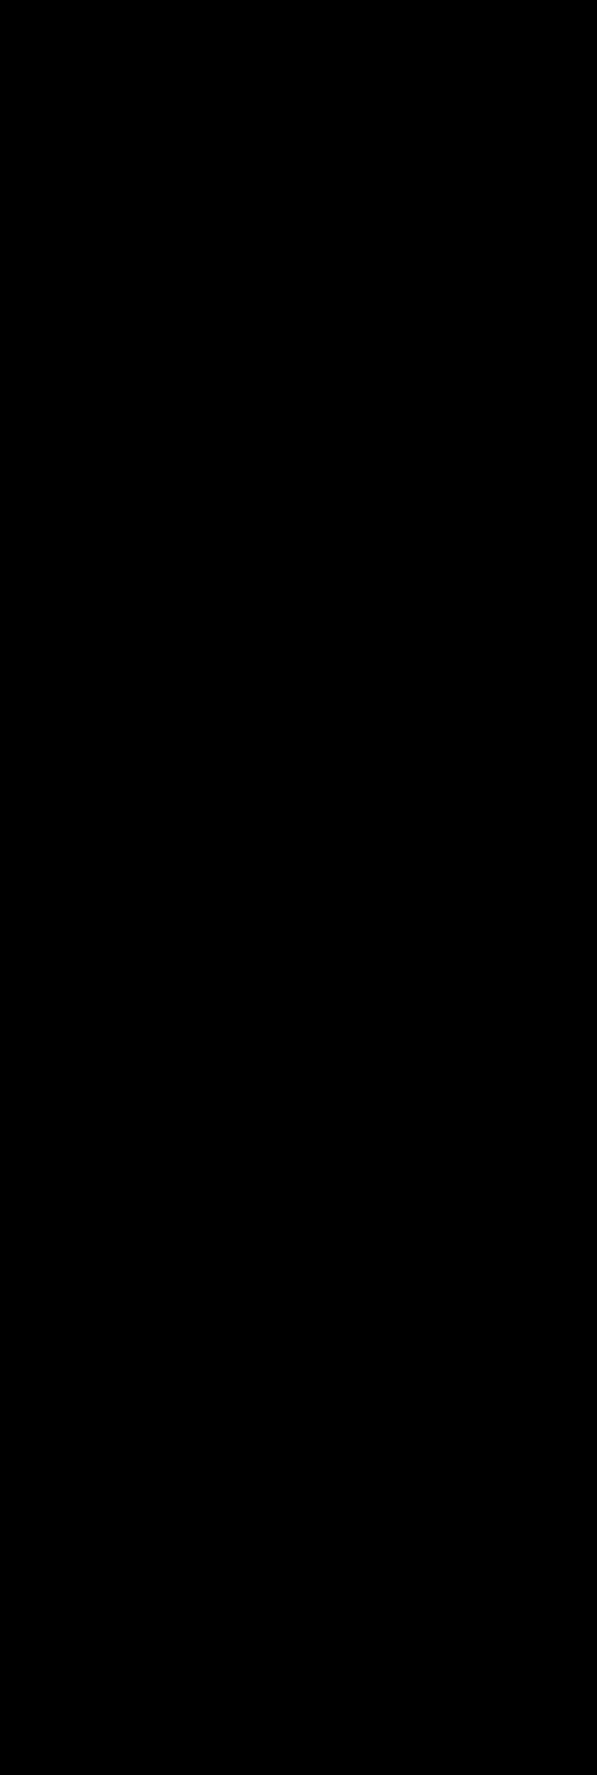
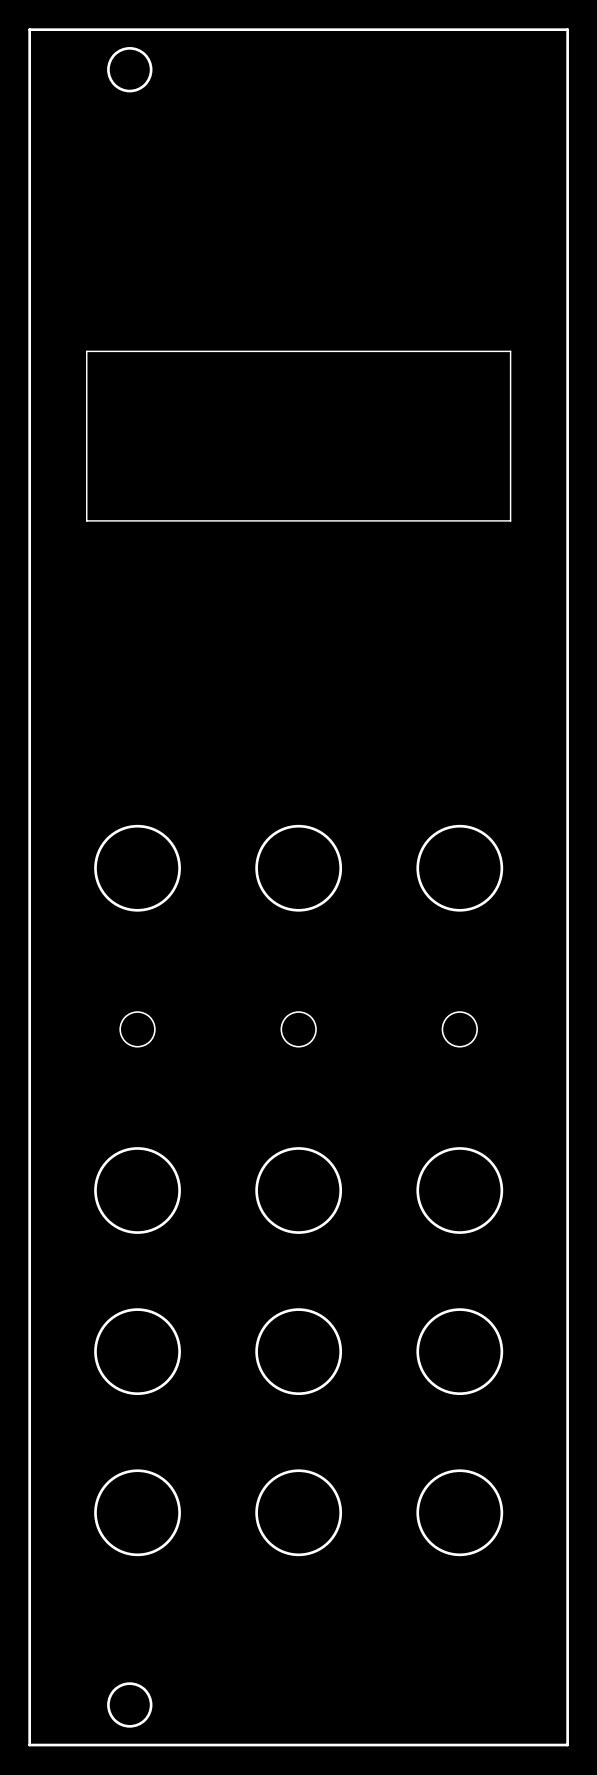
board edge: none -> (29, 29) (567, 29) (567, 1745) (29, 1745) (29, 29)
round board edge: none -> [107, 47, 153, 93]
board edge: none -> (86, 351) (510, 351) (510, 520) (86, 520) (86, 351)
round board edge: none -> [94, 824, 181, 912]
round board edge: none -> [255, 824, 343, 912]
round board edge: none -> [416, 824, 504, 912]
round board edge: none -> [119, 1011, 156, 1048]
round board edge: none -> [280, 1011, 317, 1048]
round board edge: none -> [441, 1011, 478, 1048]
round board edge: none -> [94, 1147, 181, 1234]
round board edge: none -> [255, 1147, 343, 1234]
round board edge: none -> [416, 1147, 504, 1234]
round board edge: none -> [94, 1308, 181, 1396]
round board edge: none -> [255, 1308, 343, 1396]
round board edge: none -> [416, 1308, 504, 1396]
round board edge: none -> [94, 1469, 181, 1557]
round board edge: none -> [255, 1469, 343, 1557]
round board edge: none -> [416, 1469, 504, 1557]
round board edge: none -> [107, 1682, 153, 1728]

